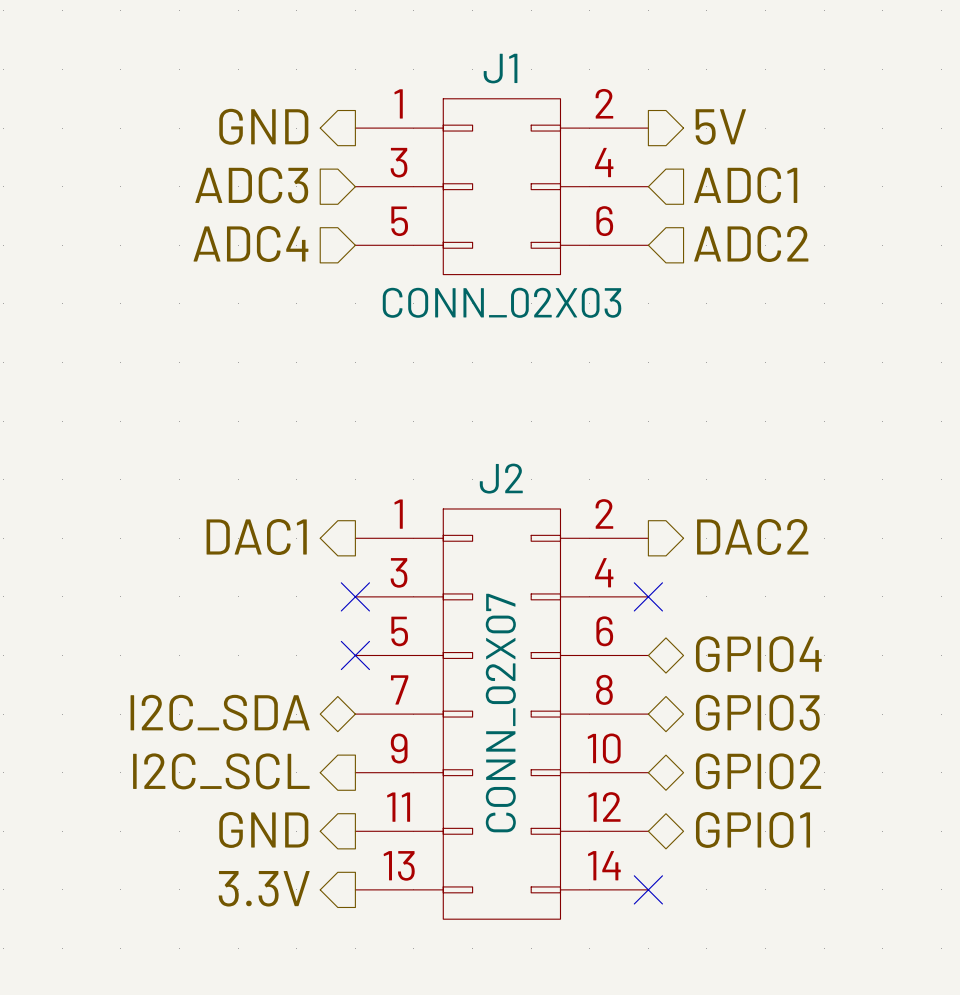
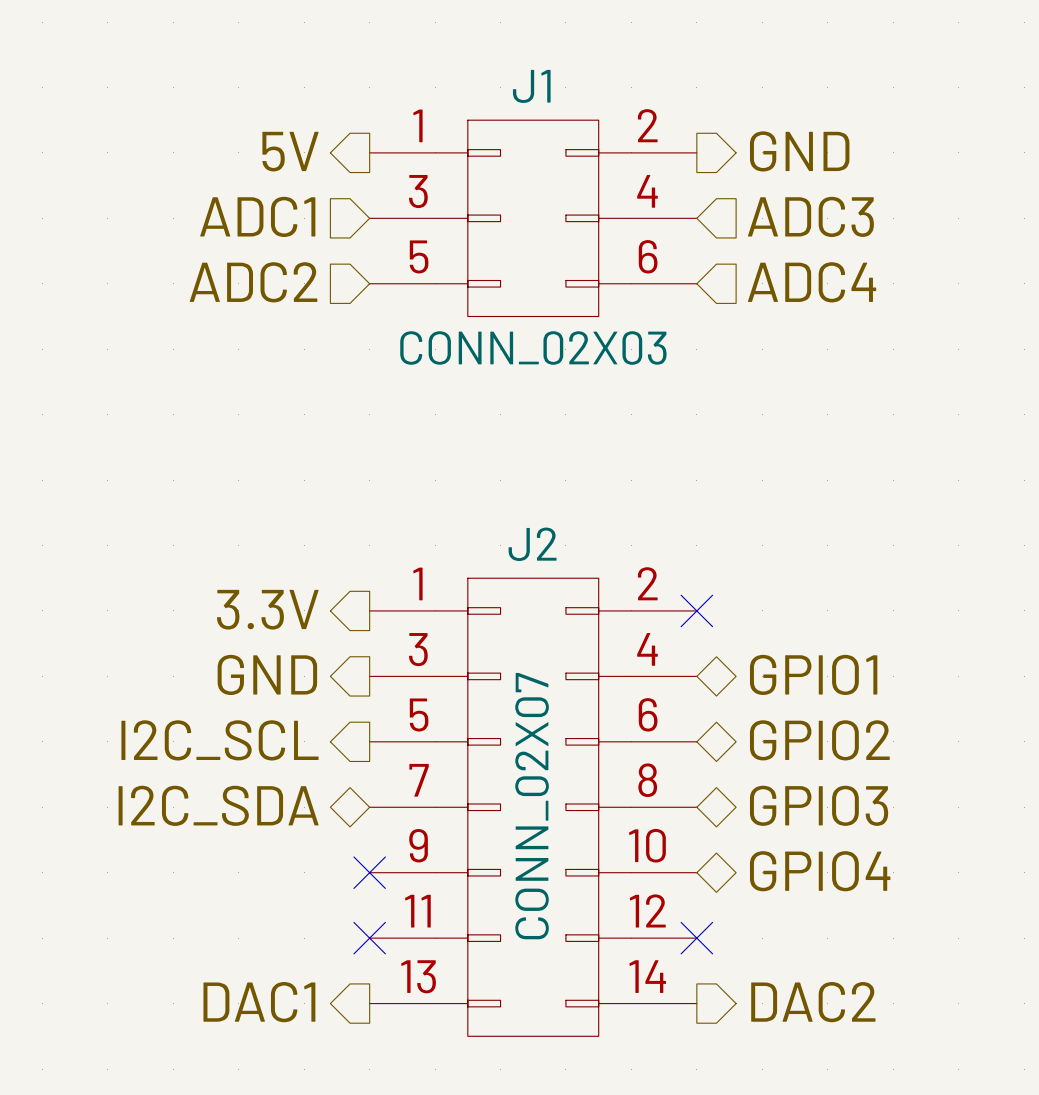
hierarchical label: GND (263, 126) -> 5V (290, 151)
hierarchical label: 5V (720, 126) -> GND (799, 151)
hierarchical label: ADC3 (251, 185) -> ADC1 (257, 216)
hierarchical label: ADC1 (745, 185) -> ADC3 (810, 216)
hierarchical label: ADC4 (250, 244) -> ADC2 (253, 282)
hierarchical label: ADC2 (751, 244) -> ADC4 (811, 282)
hierarchical label: DAC1 (256, 537) -> 3.3V (267, 609)
hierarchical label position: DAC2 (752, 537) -> DAC2 (813, 1002)
no-connect mark: (355, 596) -> none
no-connect mark position: (648, 596) -> (696, 610)
hierarchical label: GPIO4 (758, 654) -> GPIO2 (819, 740)
no-connect mark: (355, 655) -> none
hierarchical label position: I2C_SCL (221, 771) -> I2C_SCL (219, 740)
hierarchical label: GPIO2 (758, 771) -> GPIO4 (820, 871)
no-connect mark: none -> (369, 872)
hierarchical label position: GND (263, 829) -> GND (267, 674)
hierarchical label position: GPIO1 (752, 829) -> GPIO1 (813, 674)
no-connect mark: none -> (369, 938)
hierarchical label: 3.3V (264, 888) -> DAC1 (259, 1002)
no-connect mark position: (648, 889) -> (696, 938)

